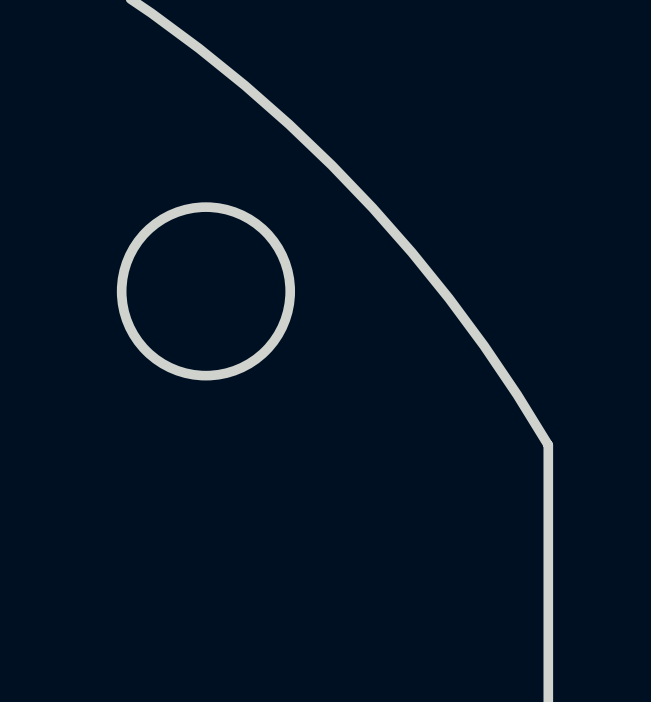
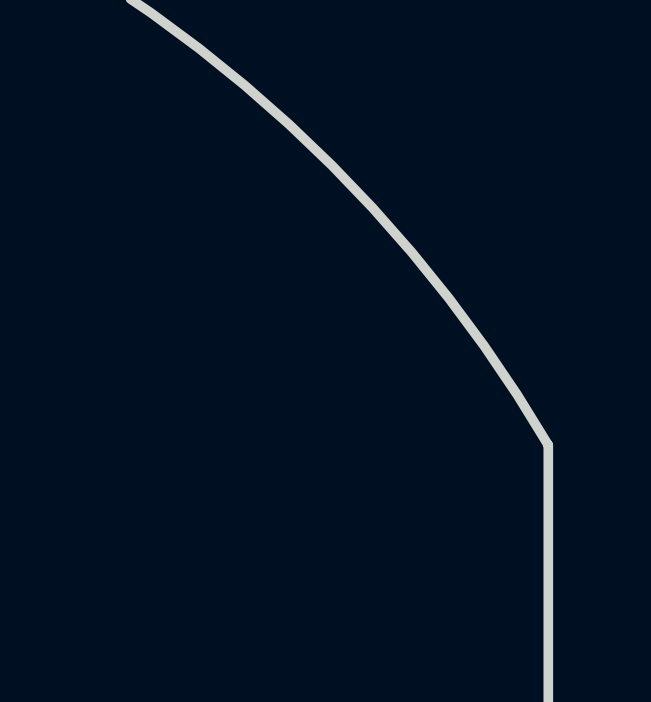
round board edge: [116, 202, 296, 381] -> none

